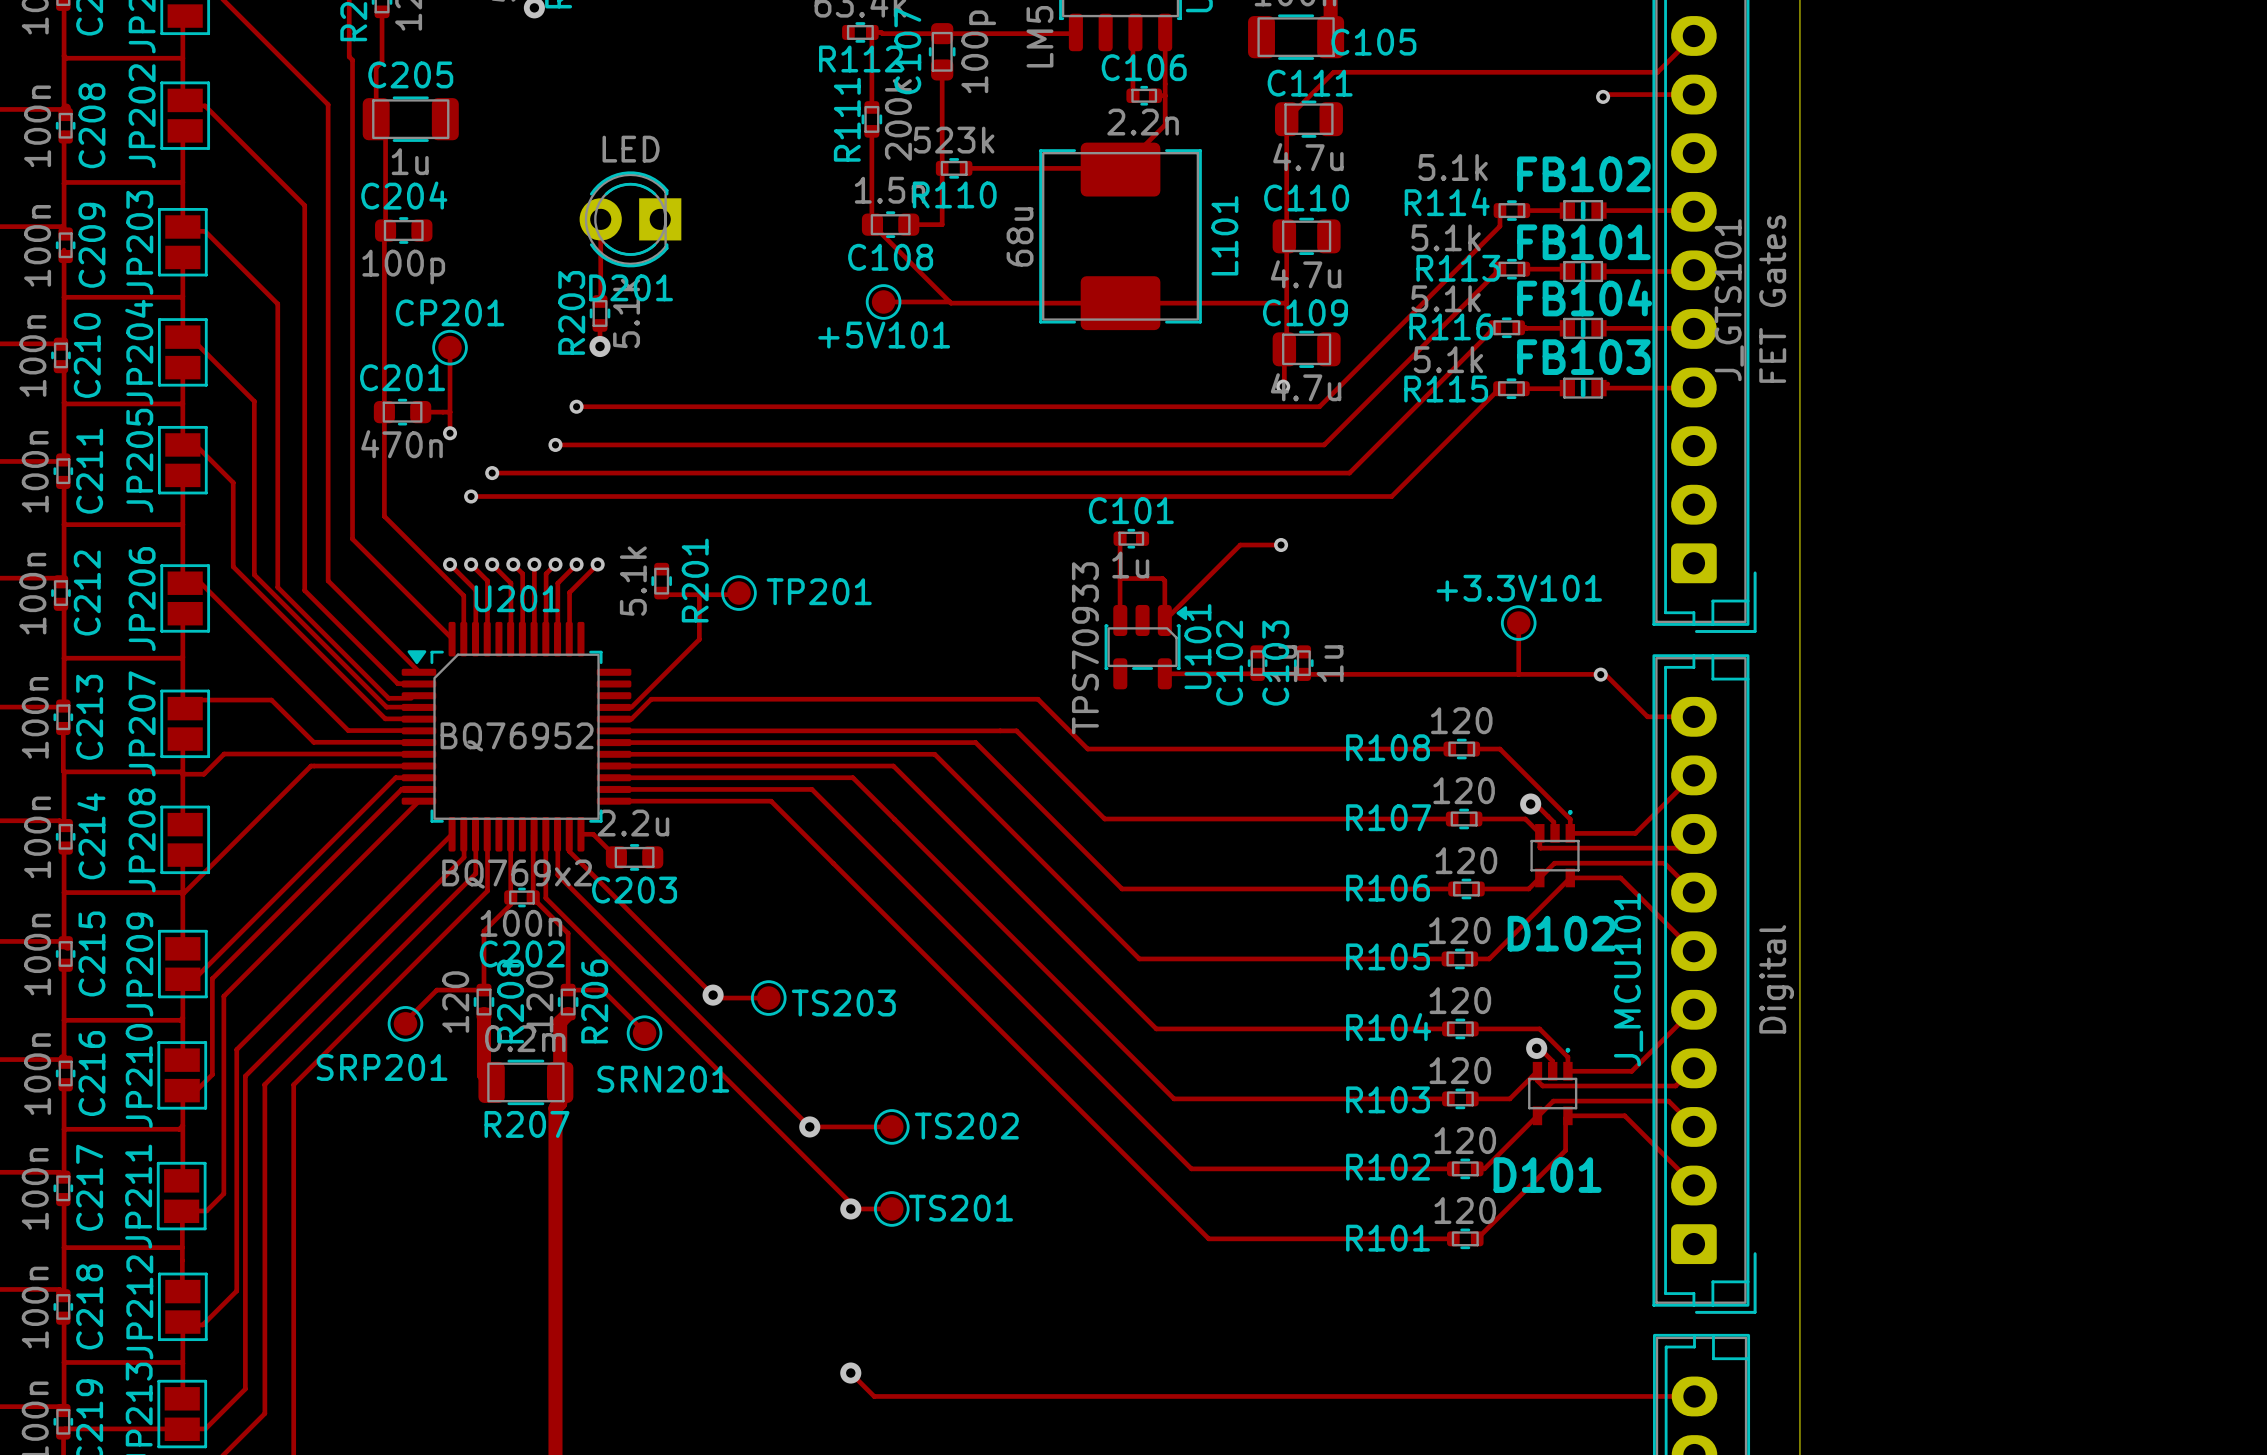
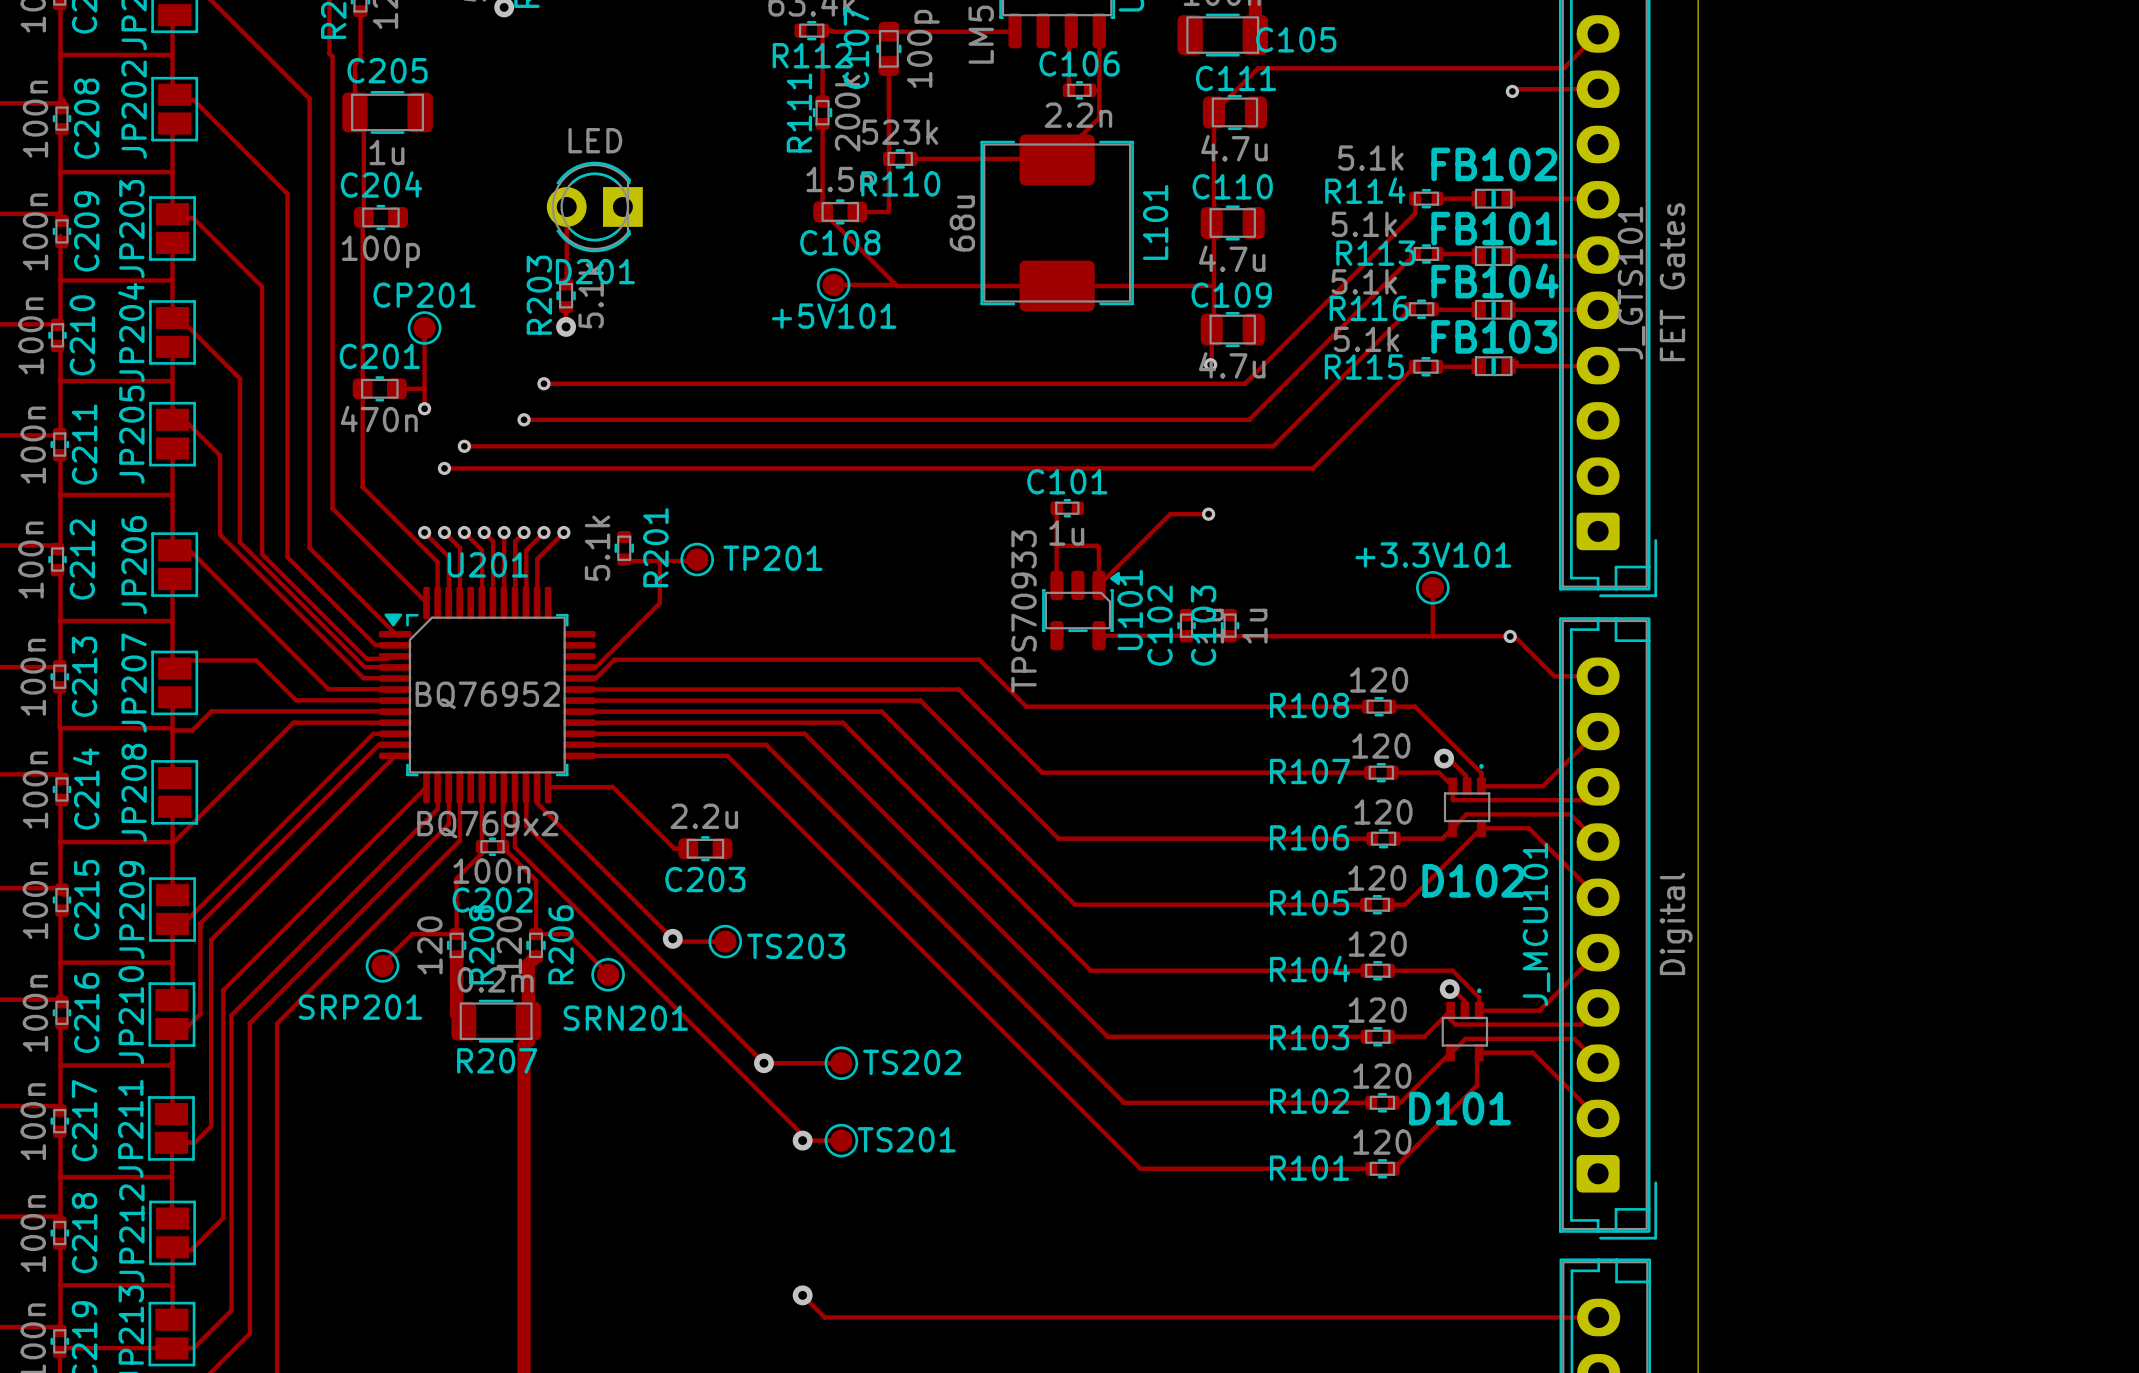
track: none -> (612, 786) (674, 848) (688, 848)
track: (593, 834) (616, 857) -> (559, 787) (612, 787)
C203 position: (634, 857) -> (705, 848)

